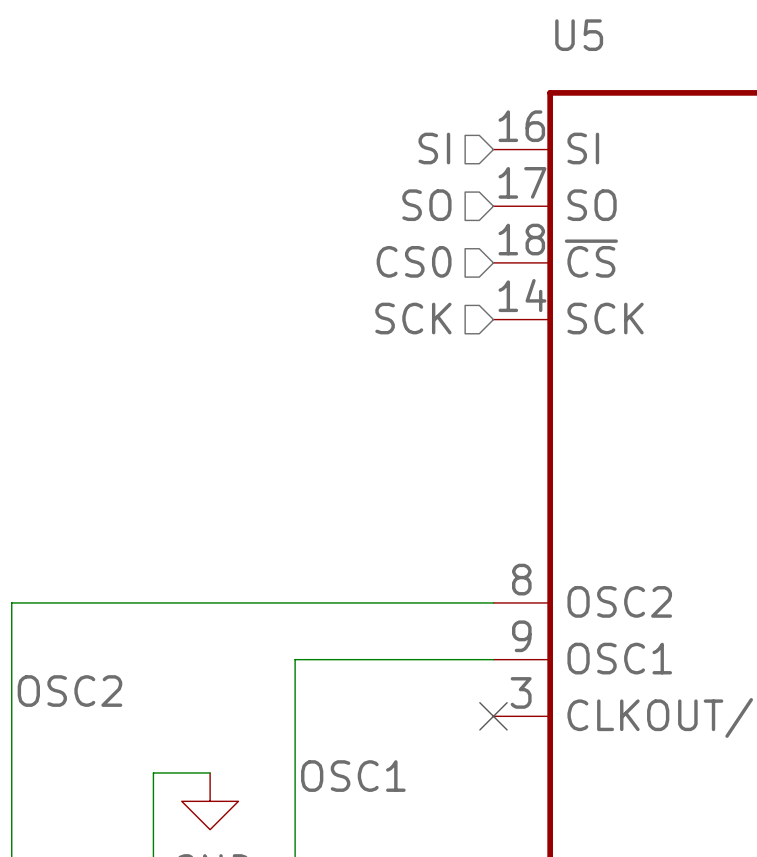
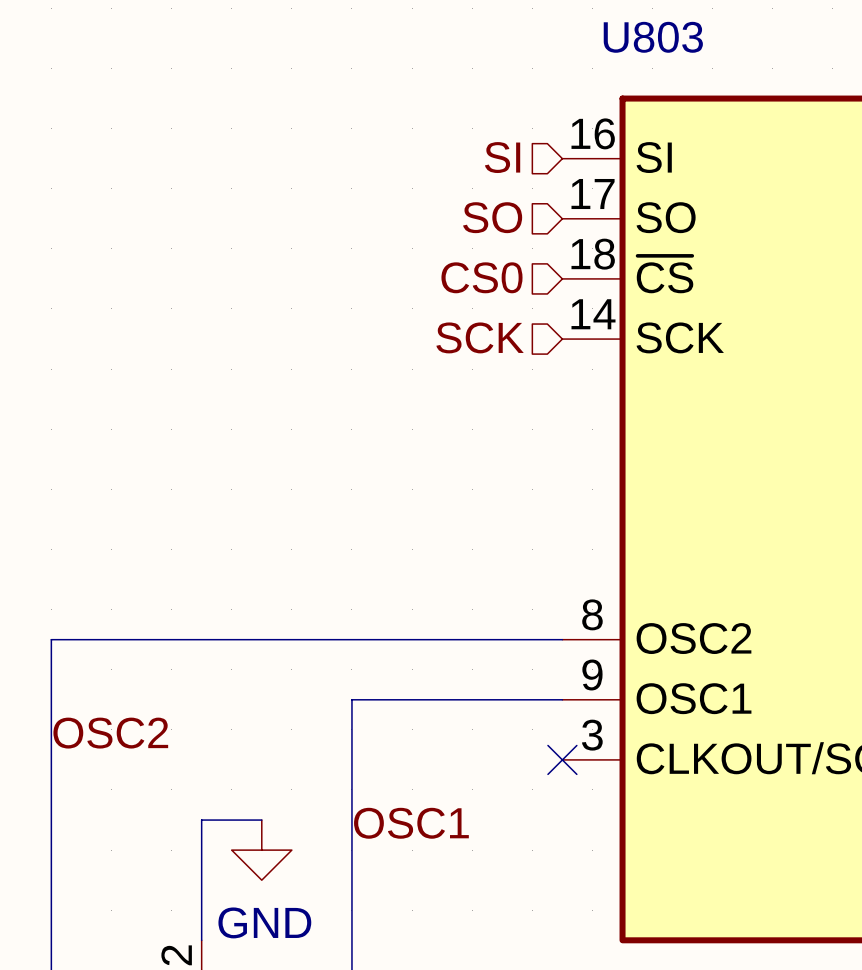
U5 name: U5 (579, 35) -> U803 (653, 37)

